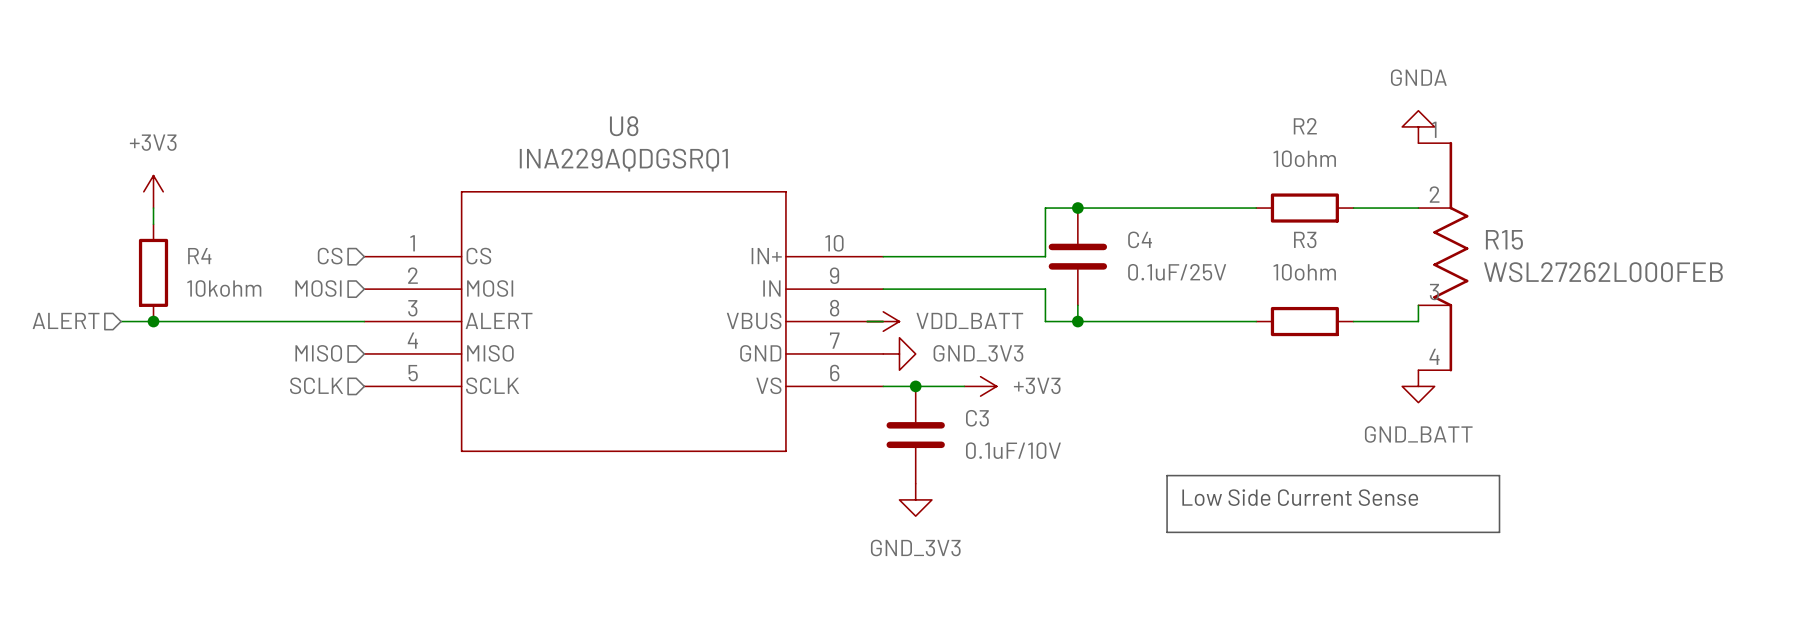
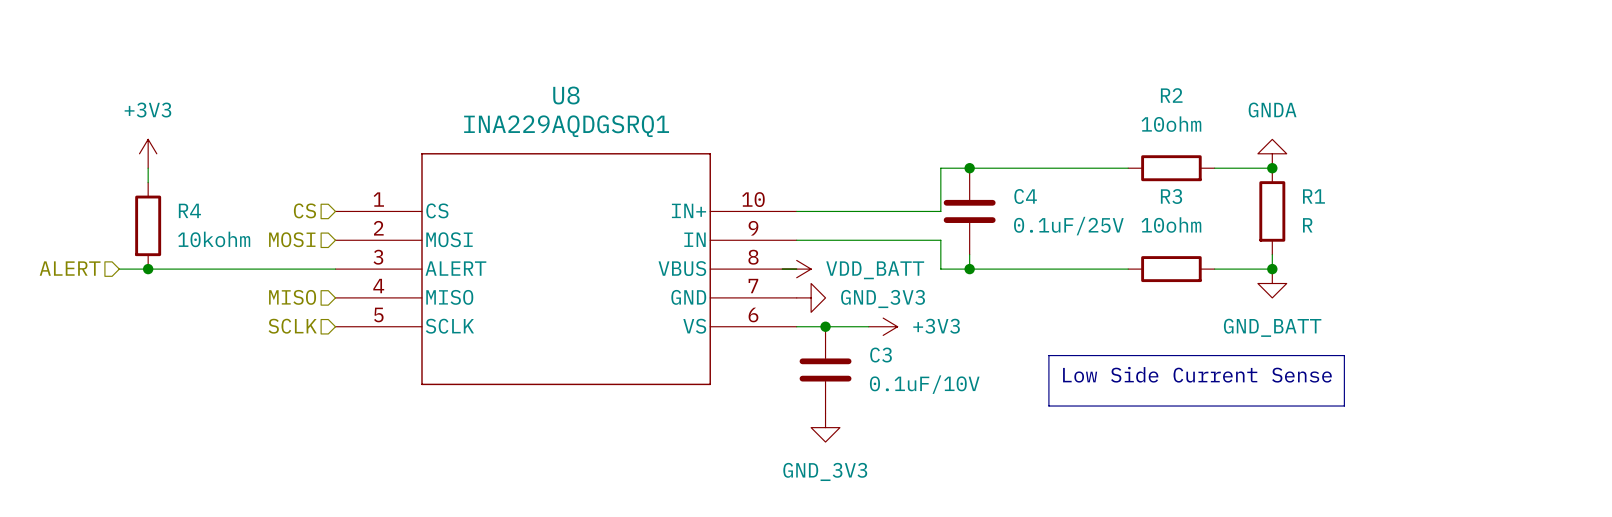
power symbol position: GNDA (1418, 126) -> GNDA (1272, 153)
junction: none -> (1272, 168)
R1: none -> R (1272, 211)
R15: WSL27262L000FEB (1443, 256) -> none
junction: none -> (1272, 269)
power symbol position: GND_BATT (1418, 386) -> GND_BATT (1272, 283)
line: (1167, 475) (1167, 532) (1499, 532) (1499, 475) -> (1048, 406) (1048, 355) (1344, 355) (1344, 406)
text position: Low Side Current Sense (1300, 497) -> Low Side Current Sense (1197, 374)

